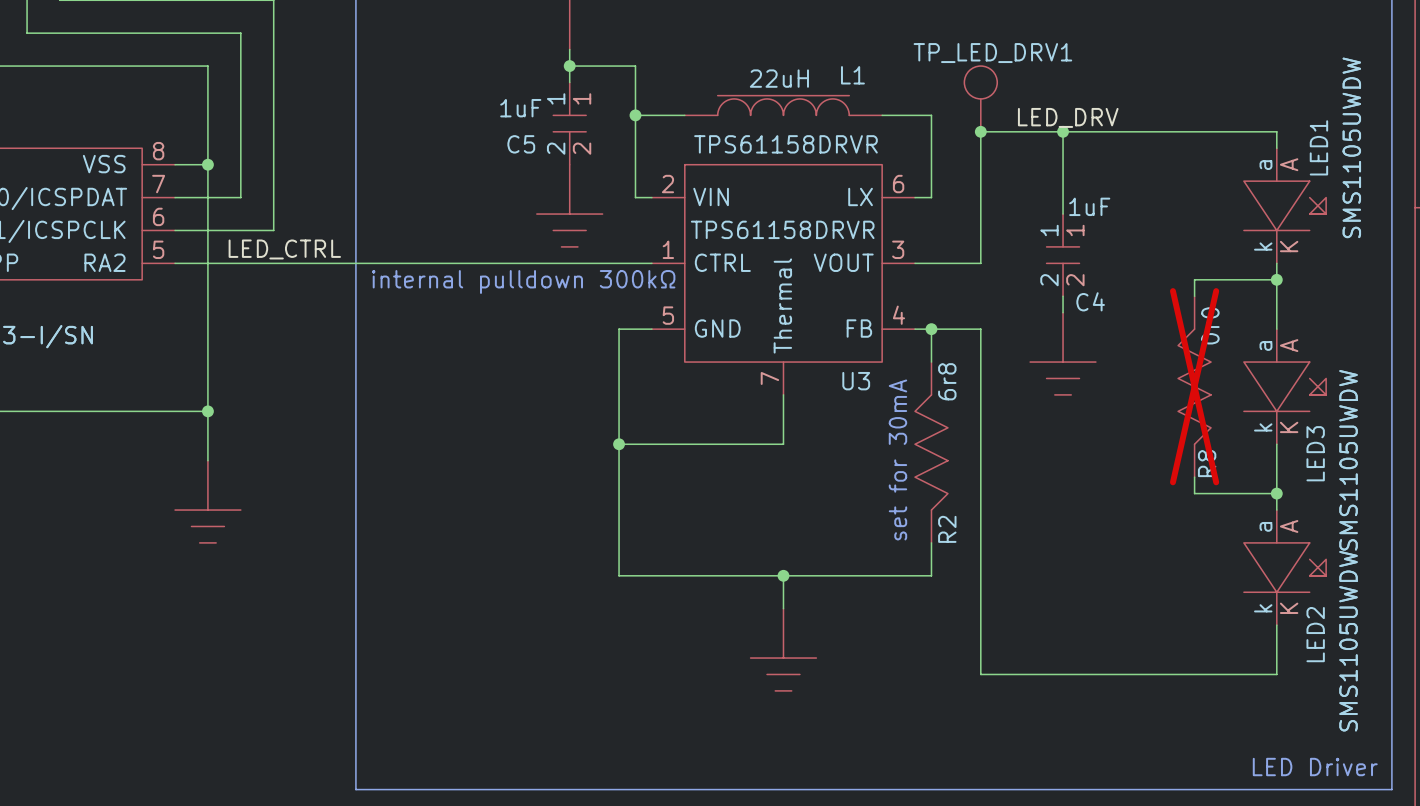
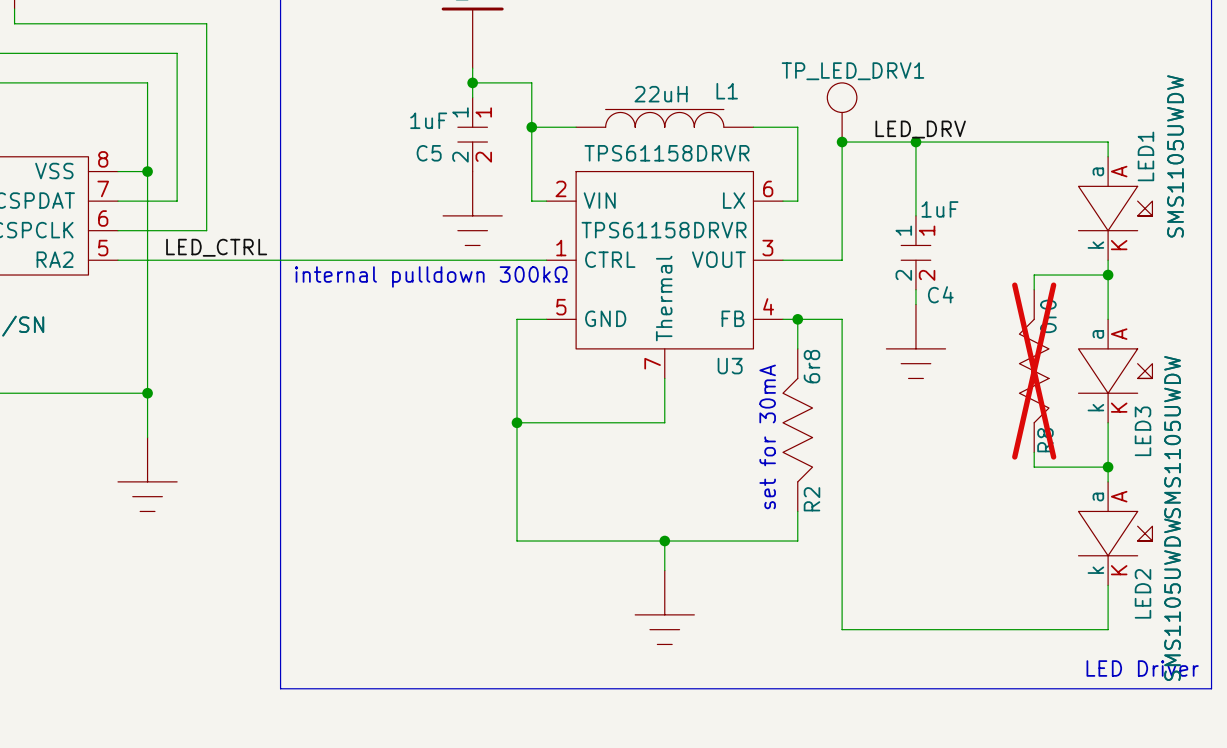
line: (355, 740) (355, 789) (1391, 789) (1391, 740) -> (280, 688) (1211, 688)
text position: LED Driver (1315, 767) -> LED Driver (1142, 668)

